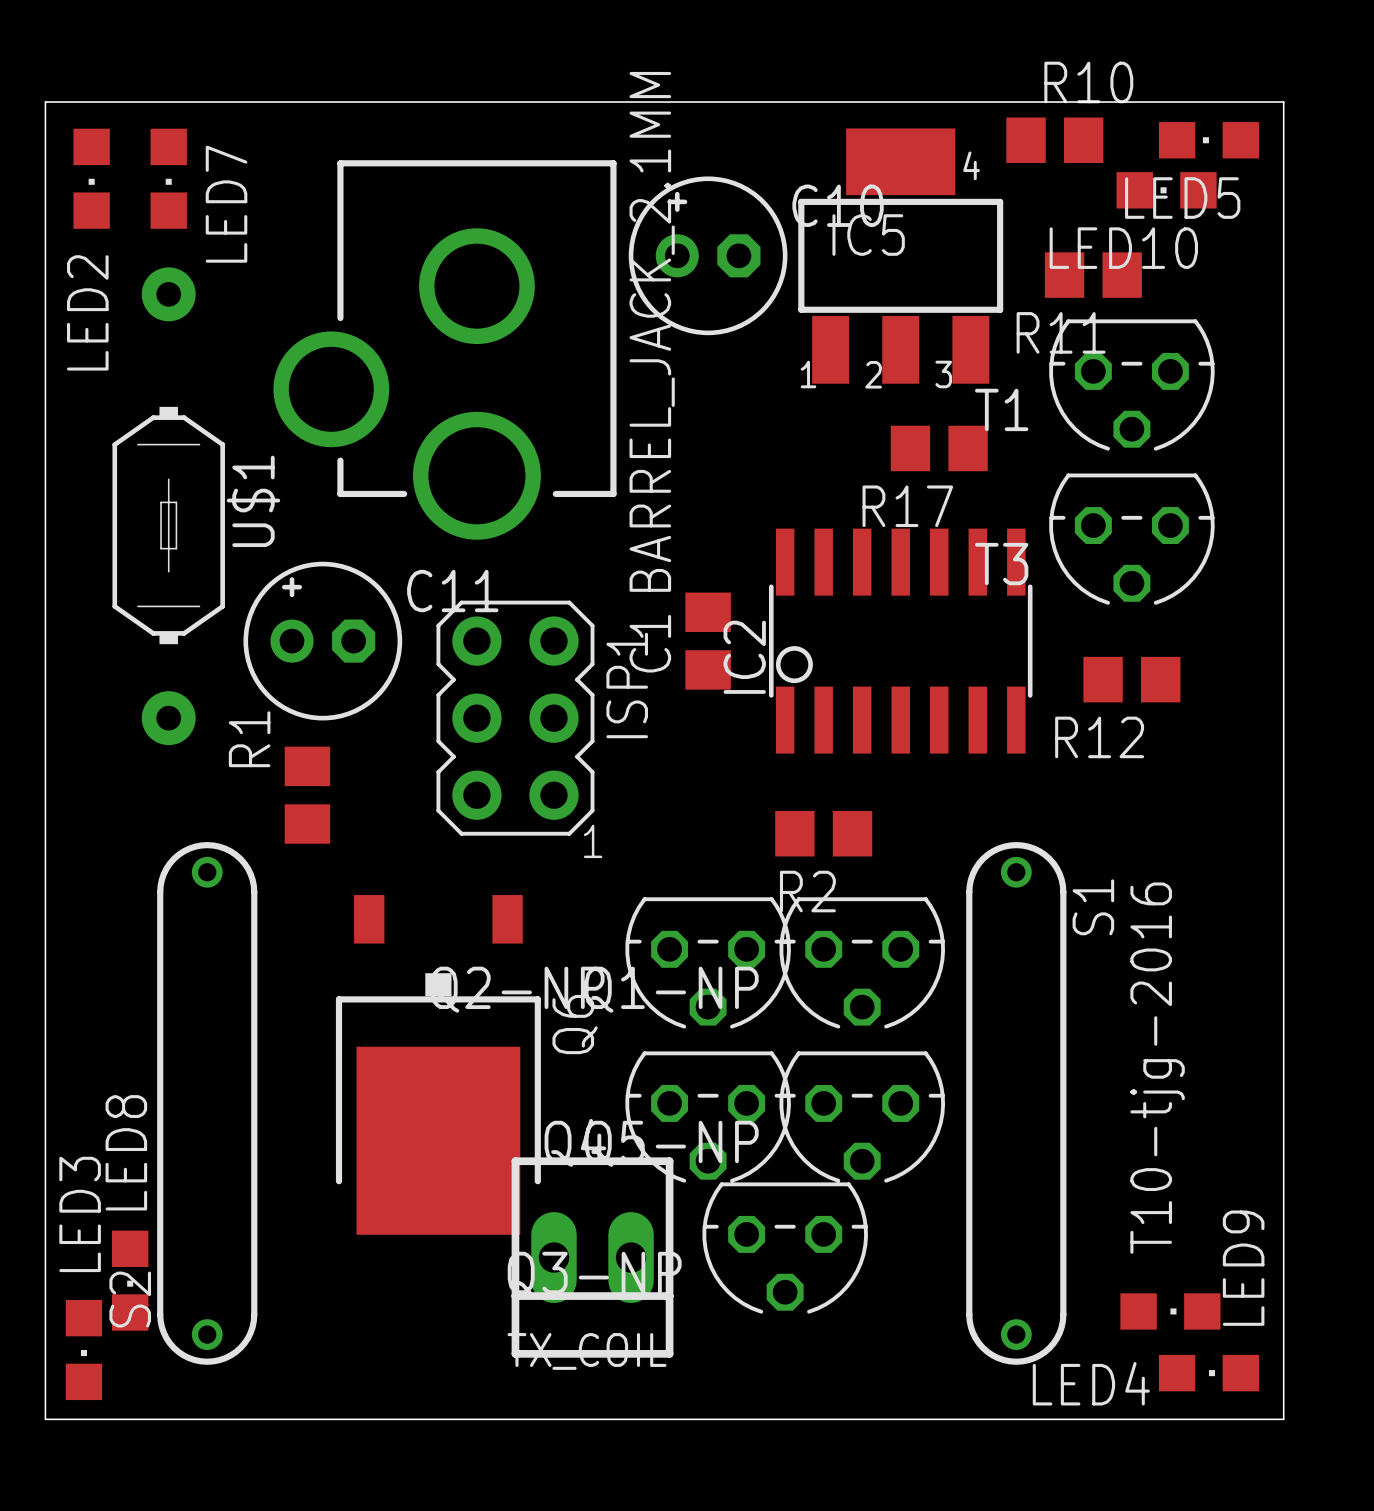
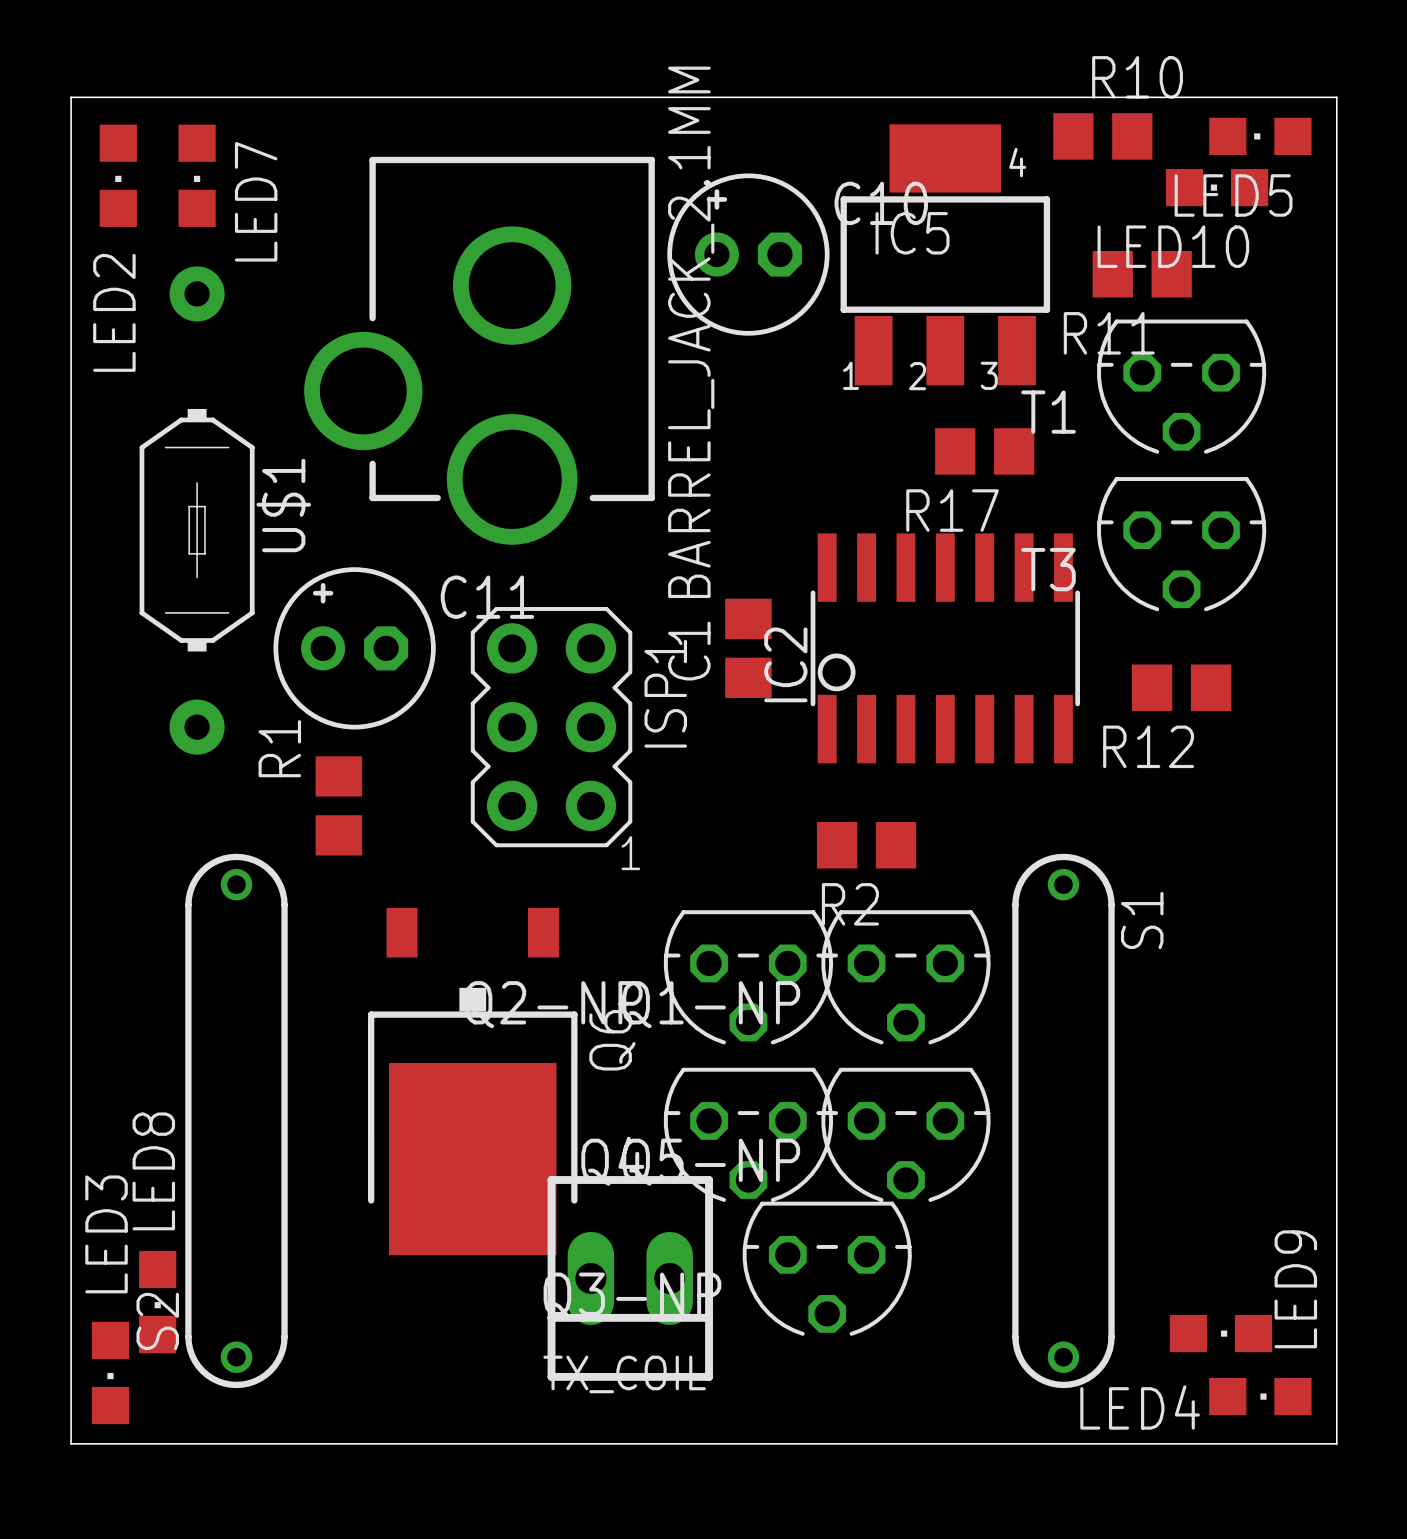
text: T10-tjg-2016 (1157, 1068) -> none

